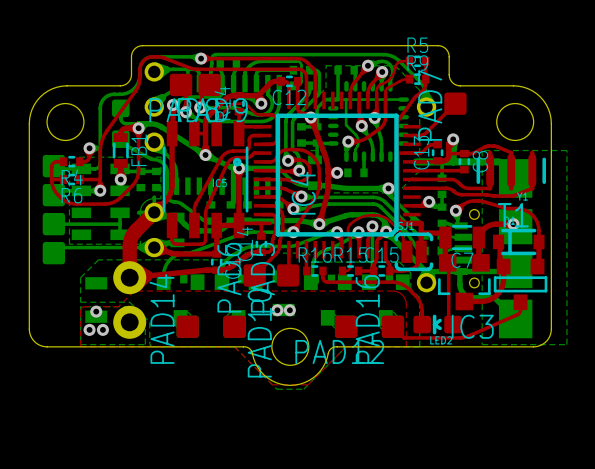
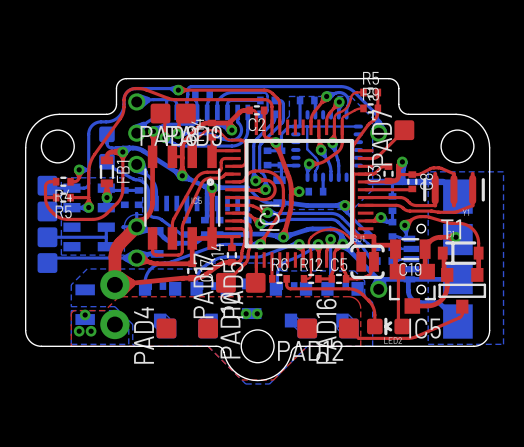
C12 name: C12 (289, 97) -> C2 (256, 124)
C13 name: C13 (421, 152) -> C3 (374, 173)
IC4 name: IC4 (303, 193) -> IC1 (269, 217)
R6 name: R6 (72, 195) -> R5 (63, 211)
R16 name: R16 (315, 254) -> R6 (279, 264)
R15 name: R15 (350, 254) -> R12 (311, 264)
C15 name: C15 (381, 254) -> C5 (339, 264)
C7 name: C7 (462, 260) -> C19 (410, 269)
PAD6 name: PAD6 (229, 277) -> PAD17 (203, 285)
PAD14 name: PAD14 (161, 319) -> PAD4 (144, 335)
IC3 name: IC3 (472, 326) -> IC5 (425, 328)

